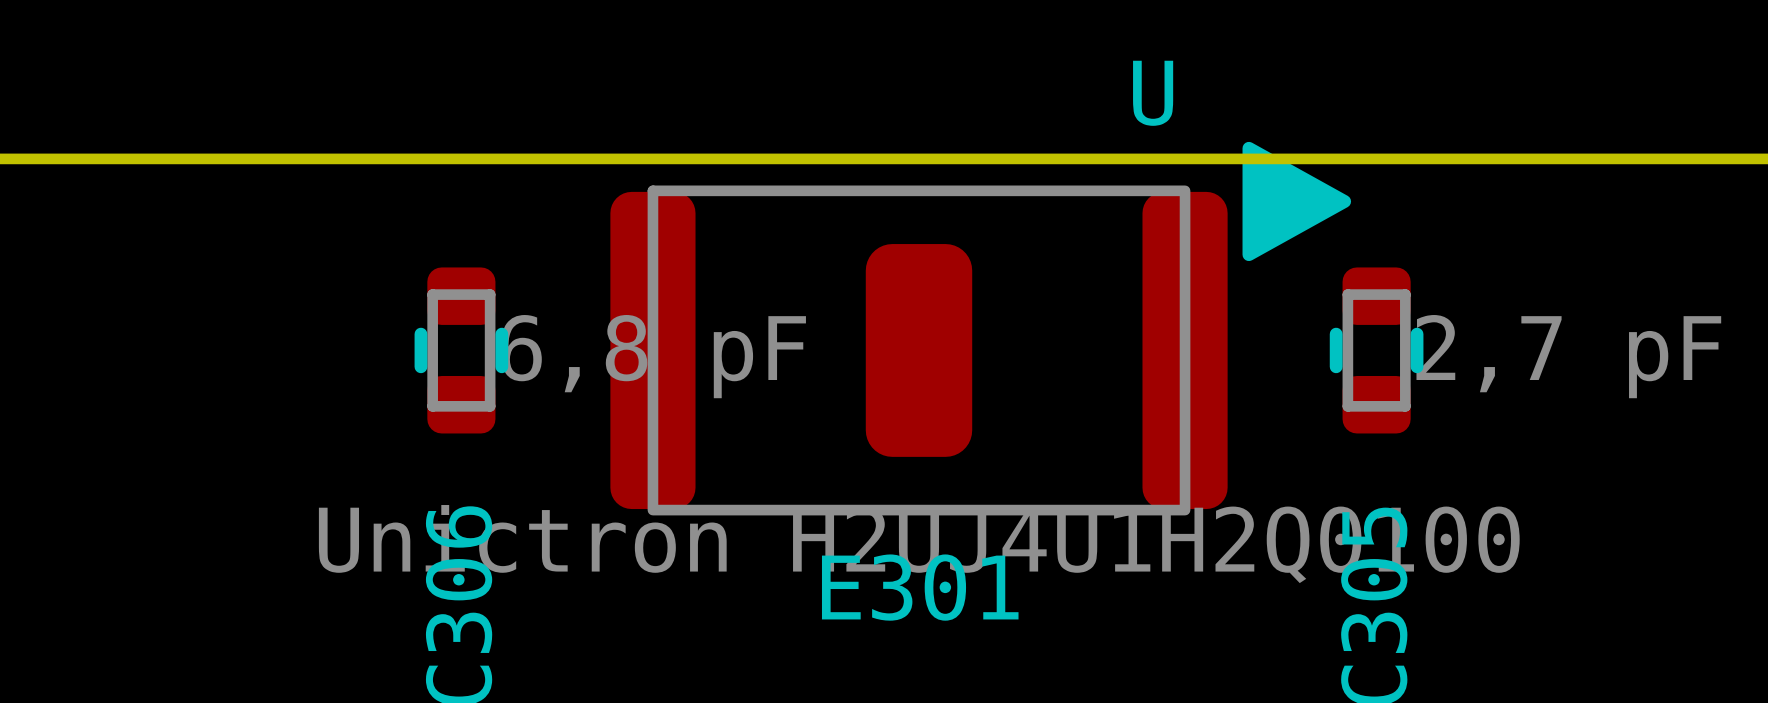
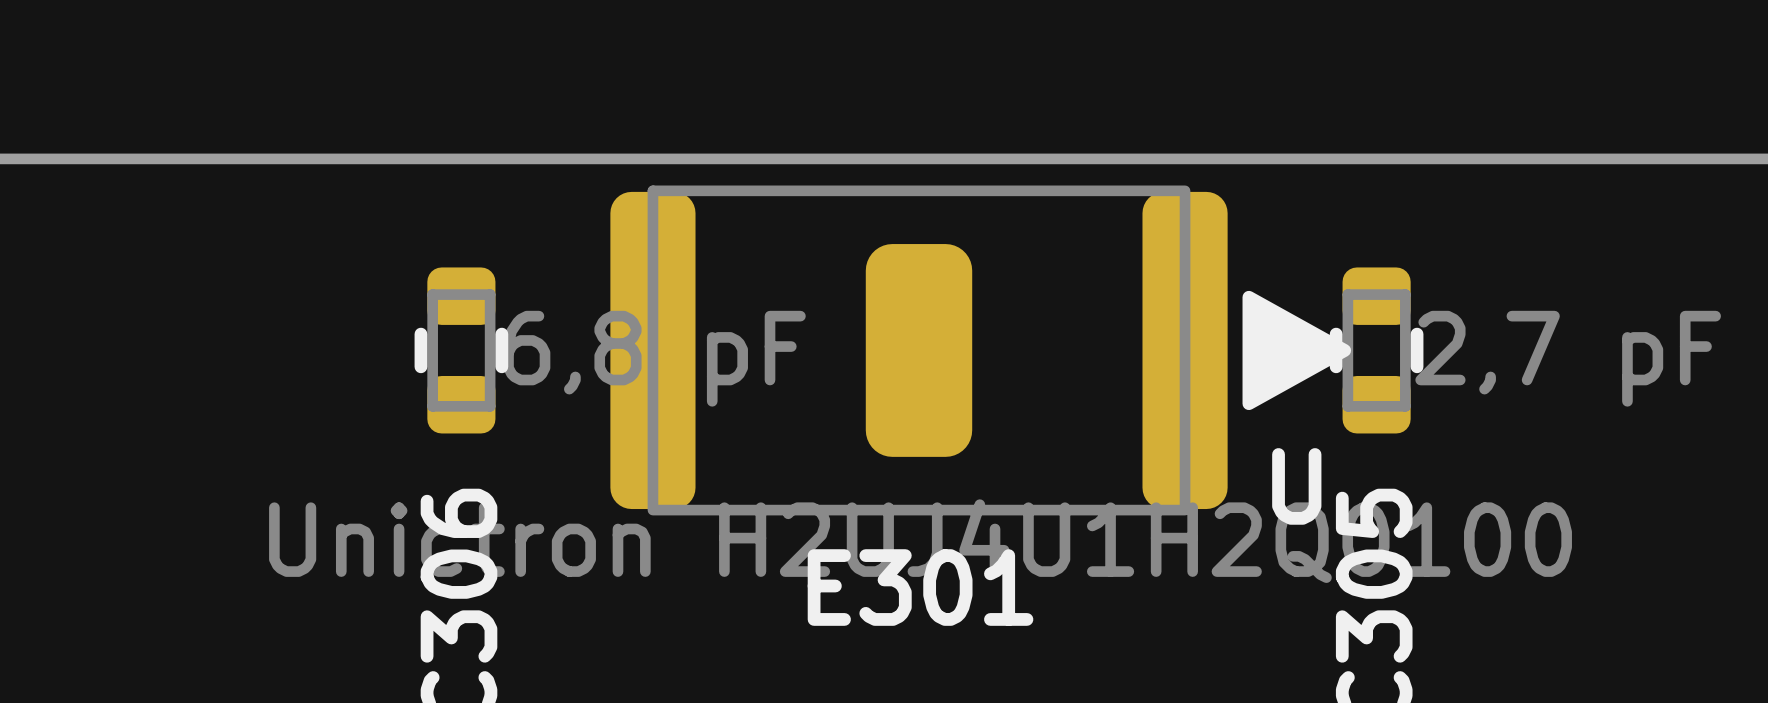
E301 footprint: [610, 141, 1352, 516] -> [610, 185, 1352, 516]

